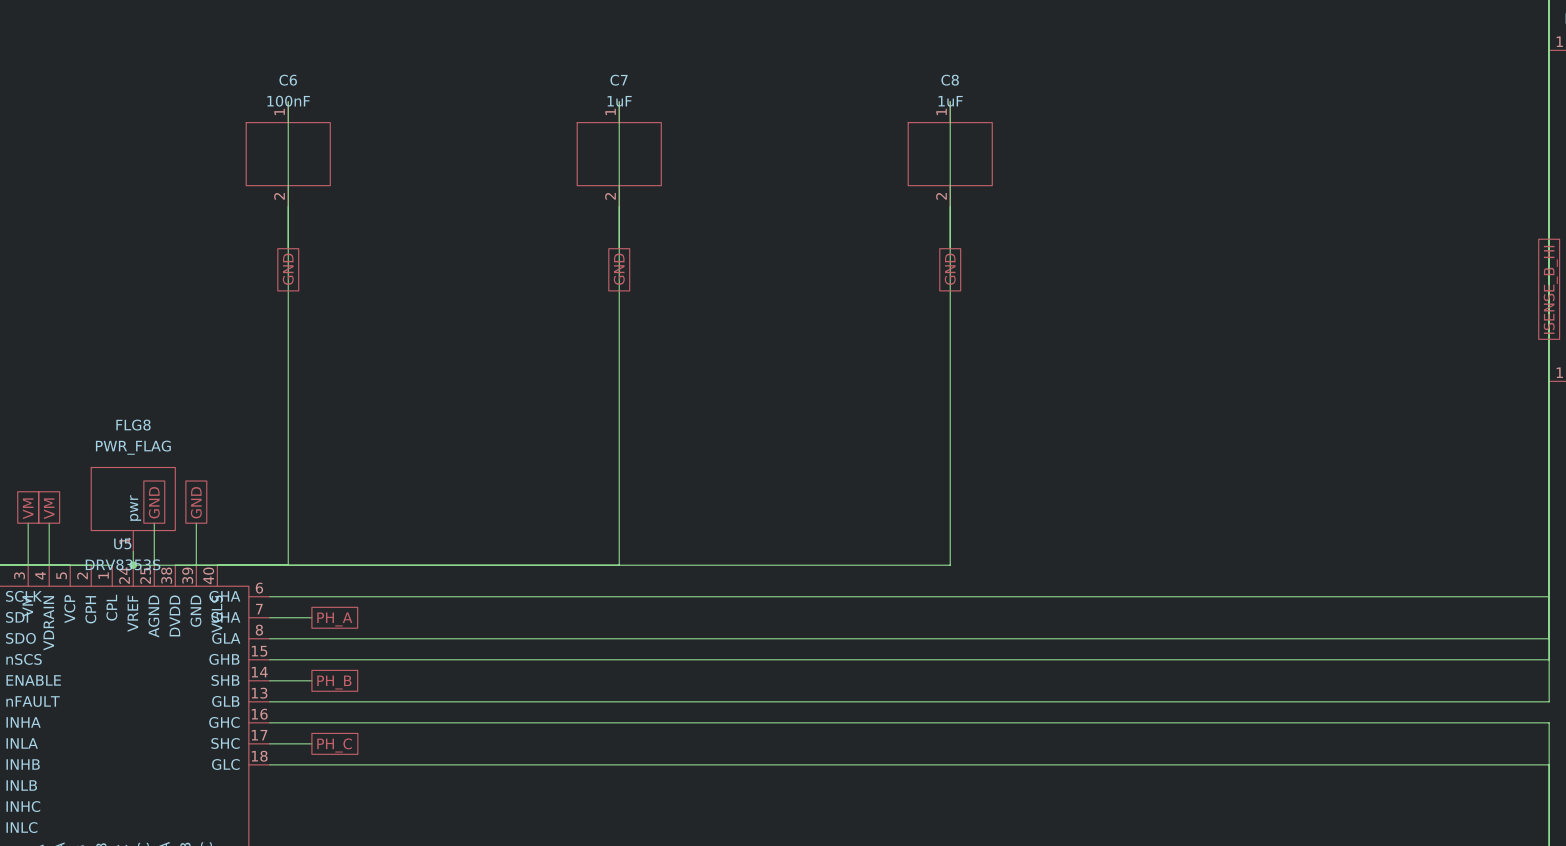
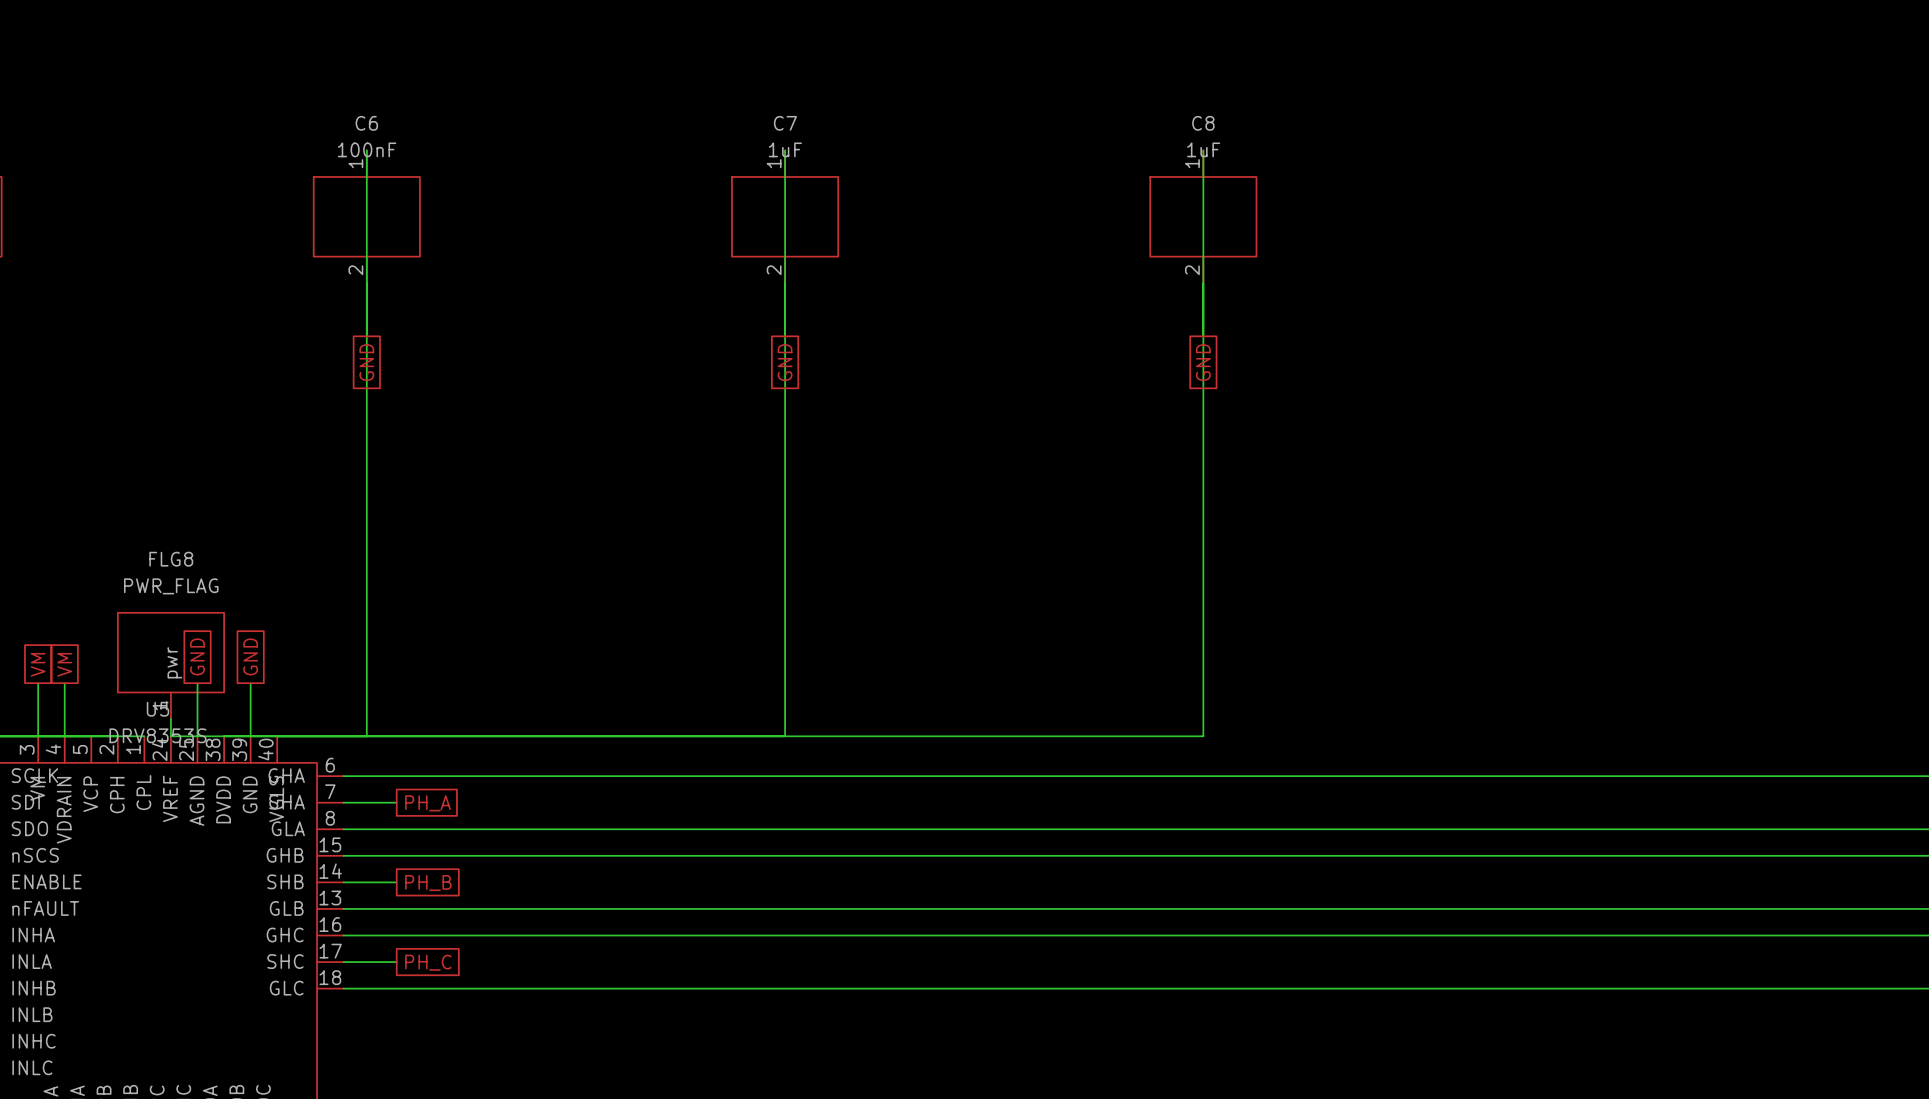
junction: (133, 565) -> none

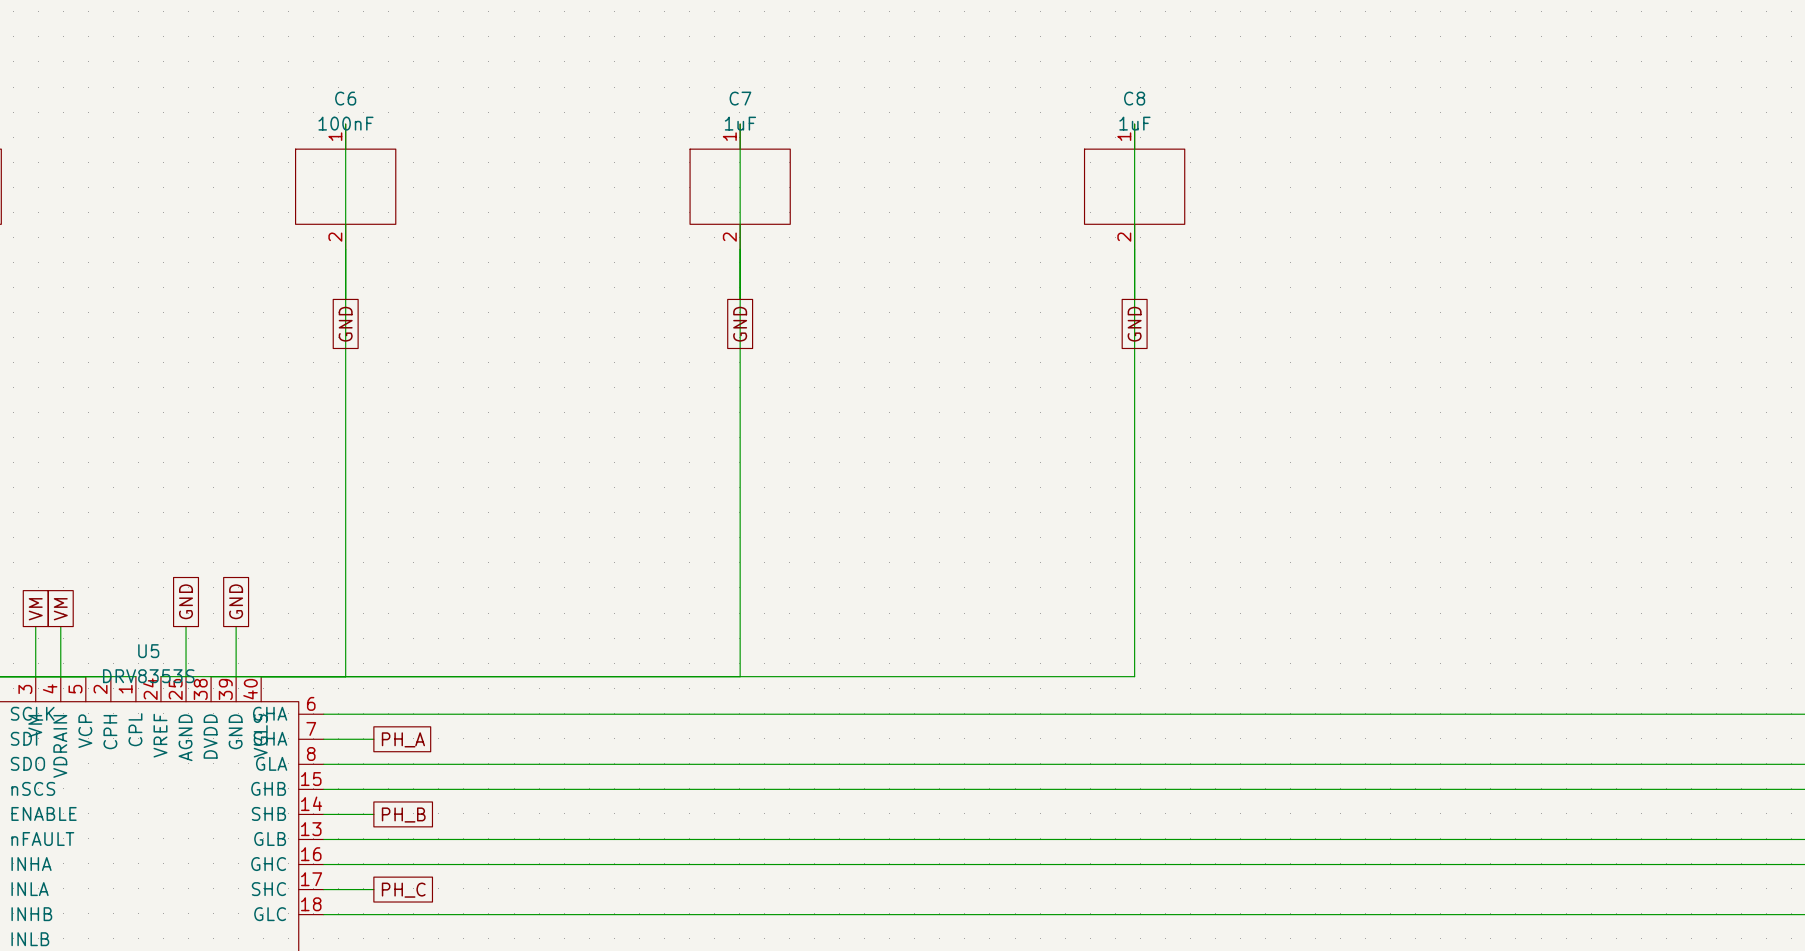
FLG8: PWR_FLAG (170, 665) -> none
wire: (170, 719) (170, 736) -> none

